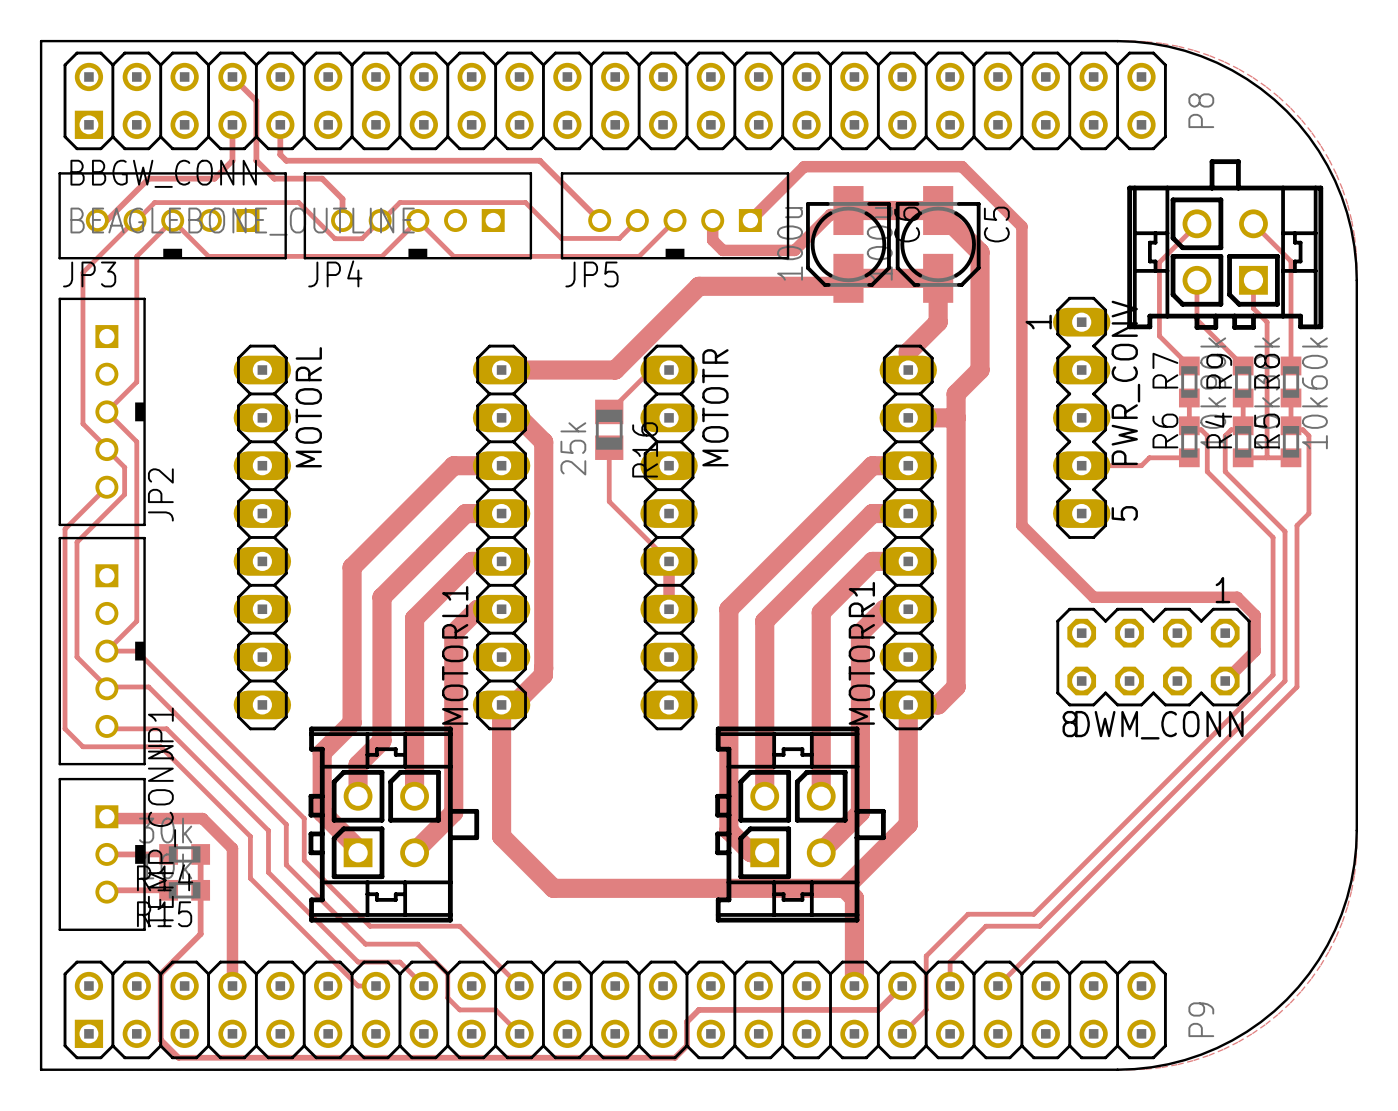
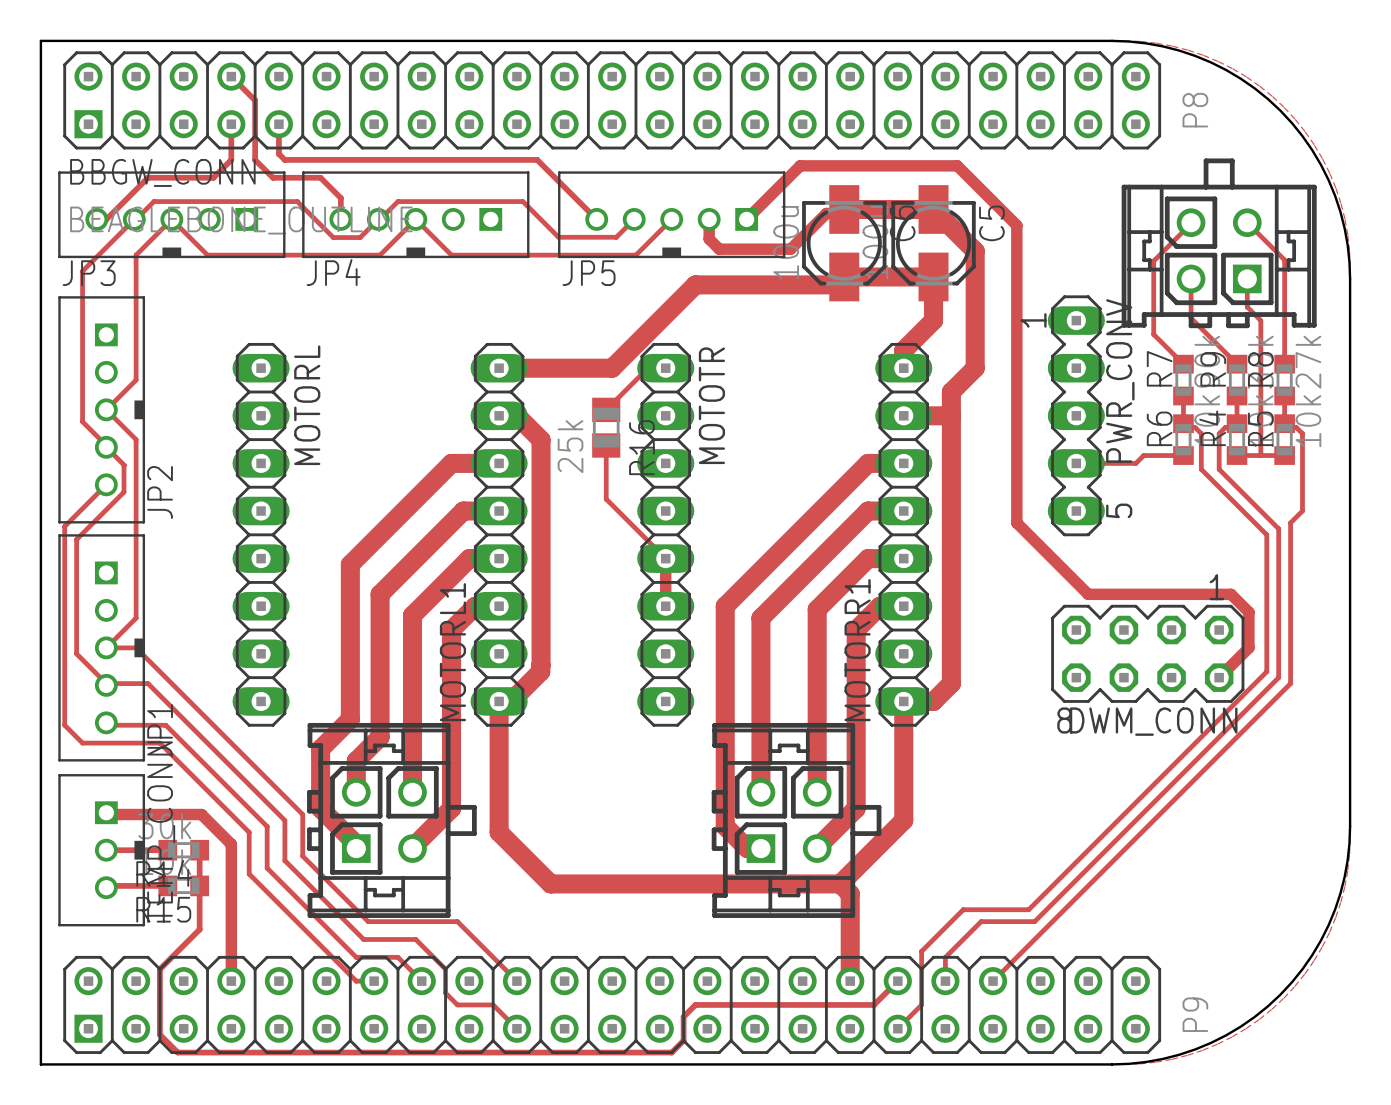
R8 value: 60k (1314, 363) -> 27k (1308, 362)

